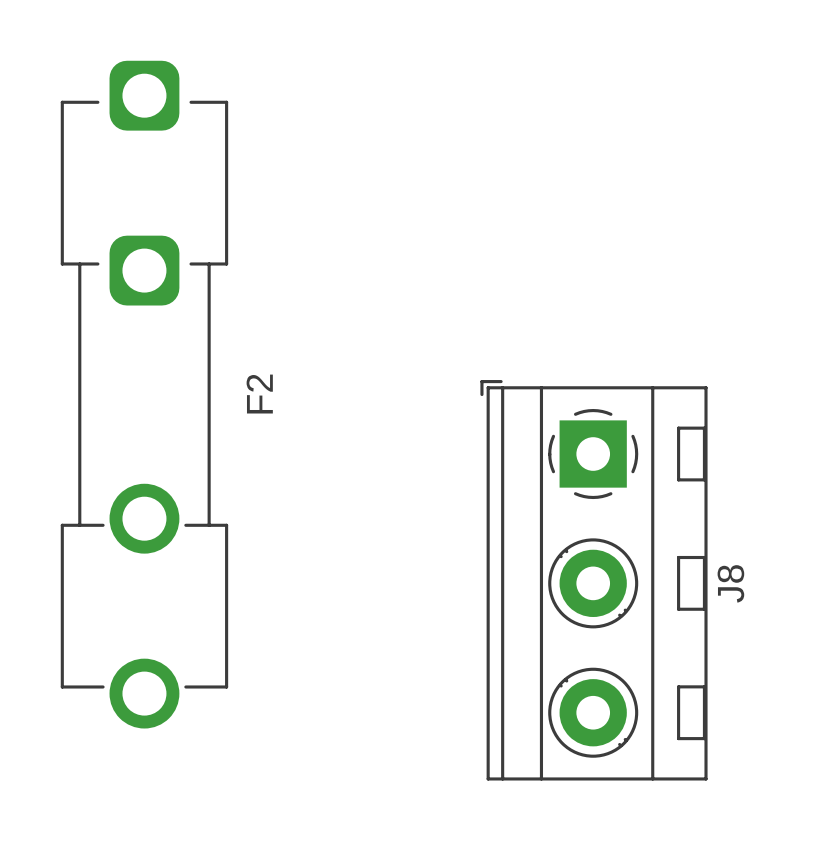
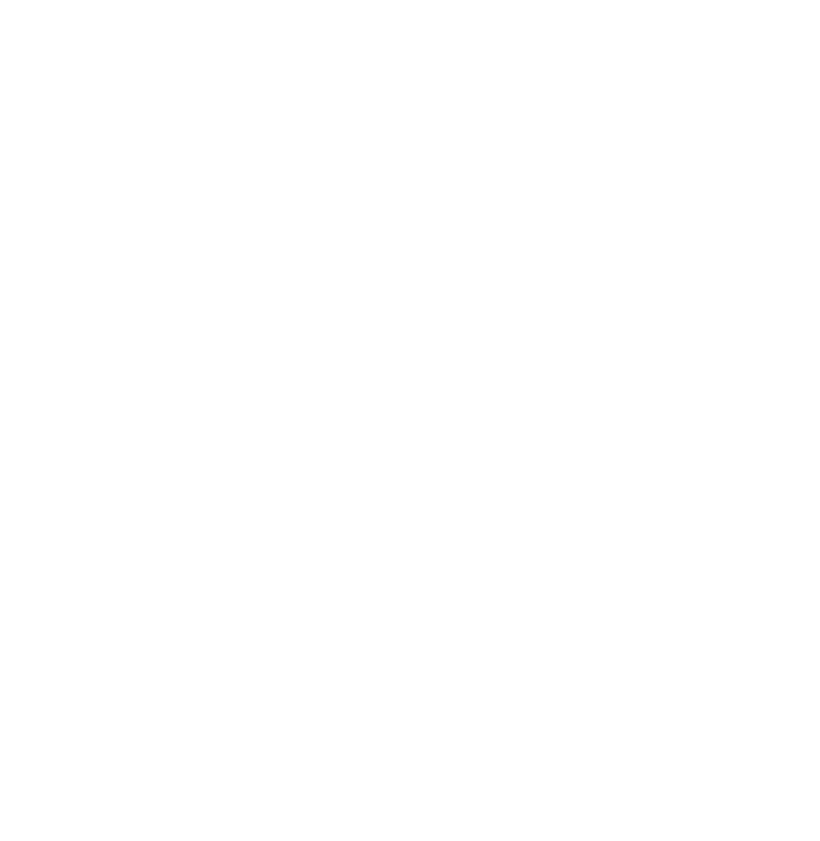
F2: (144, 394) -> none
J8: (593, 580) -> none

